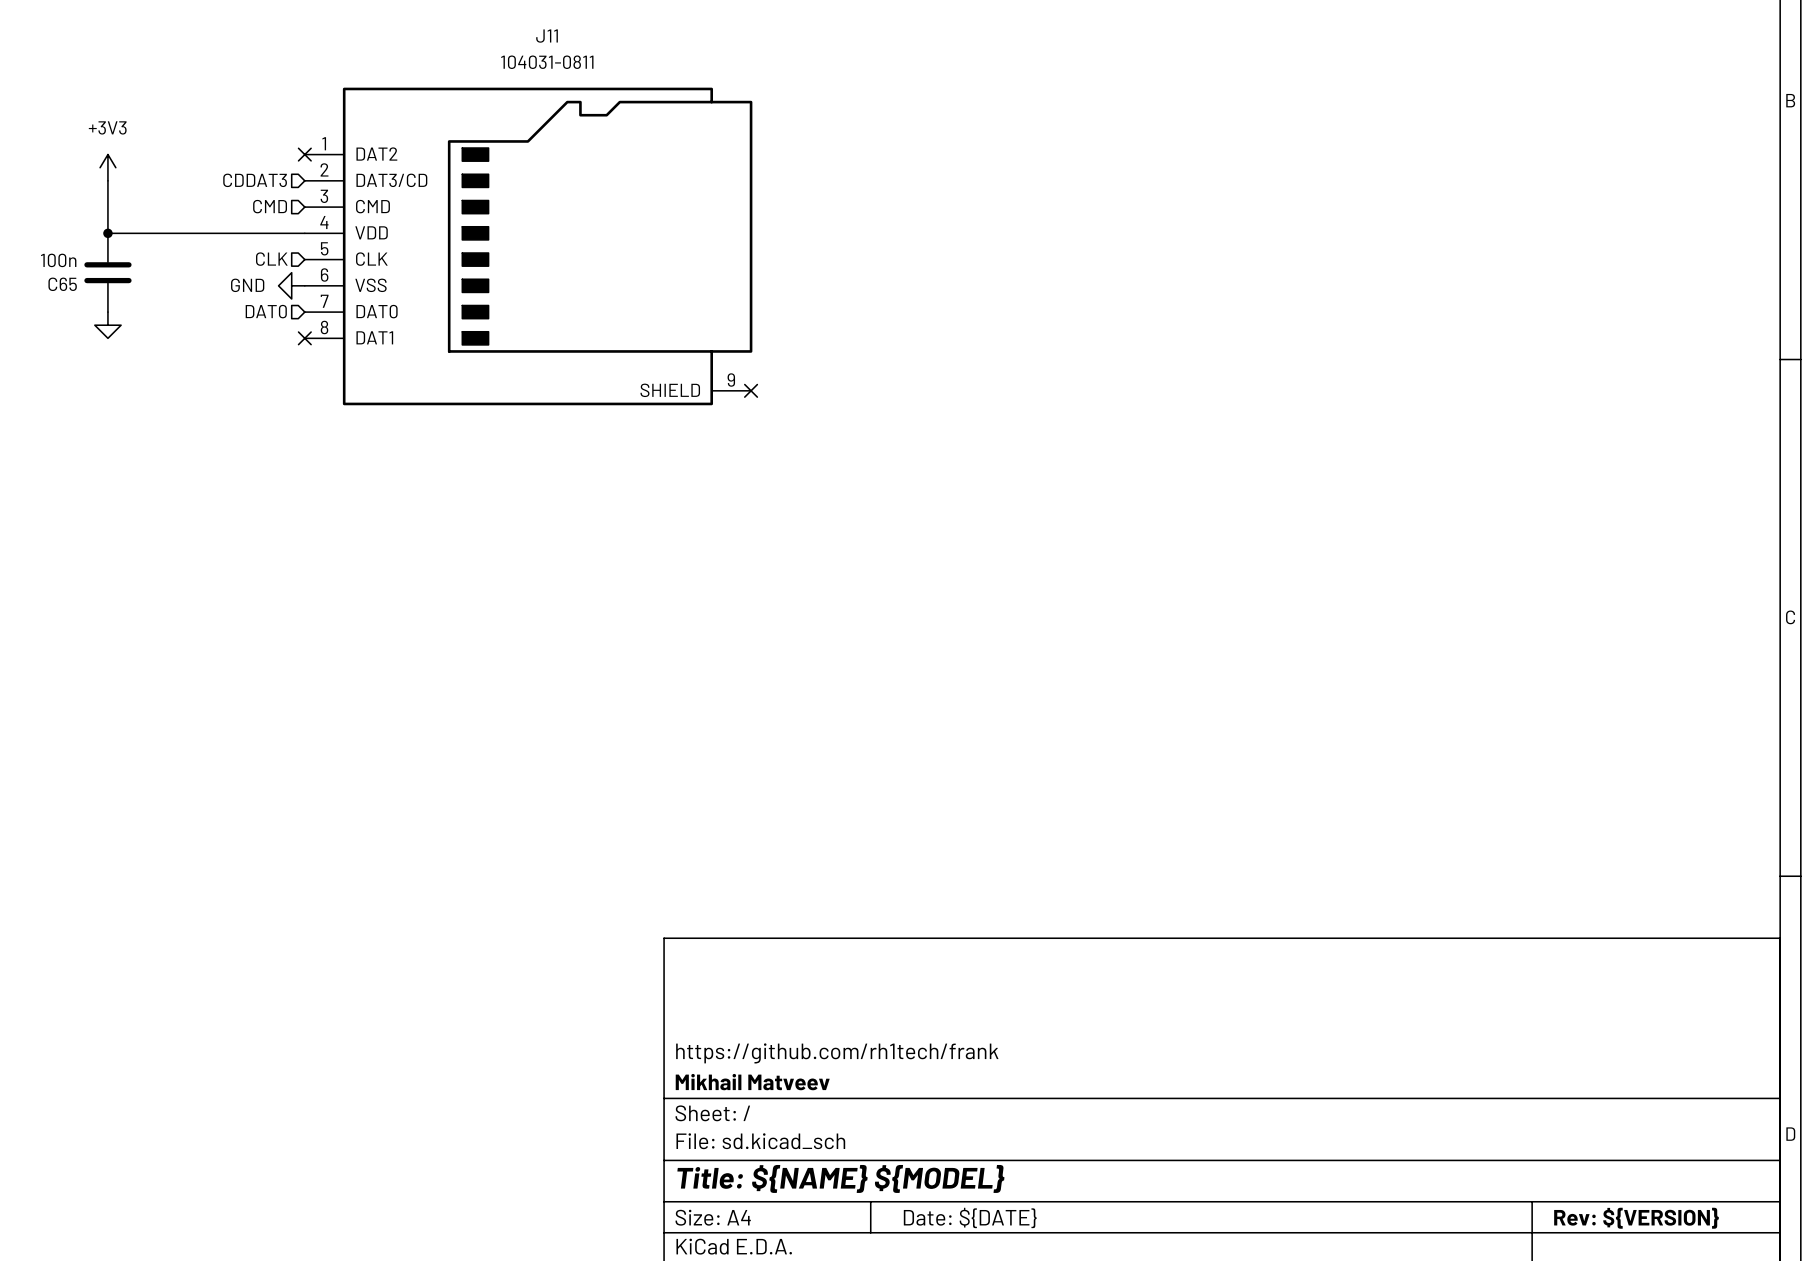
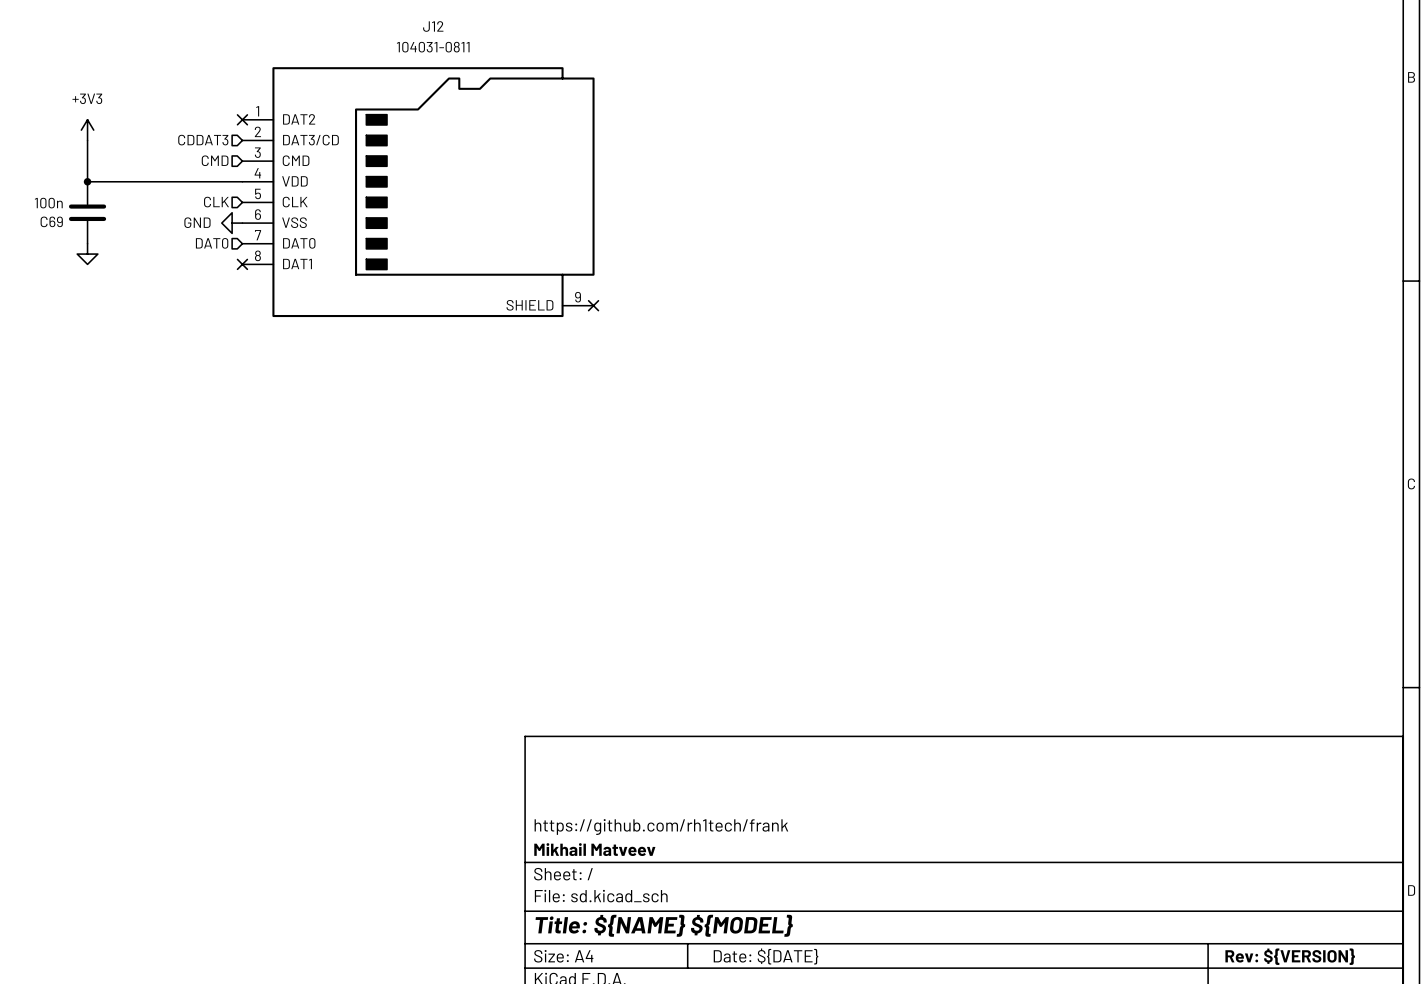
J11 name: J11 (547, 36) -> J12 (433, 26)
C65 name: C65 (62, 284) -> C69 (51, 221)

